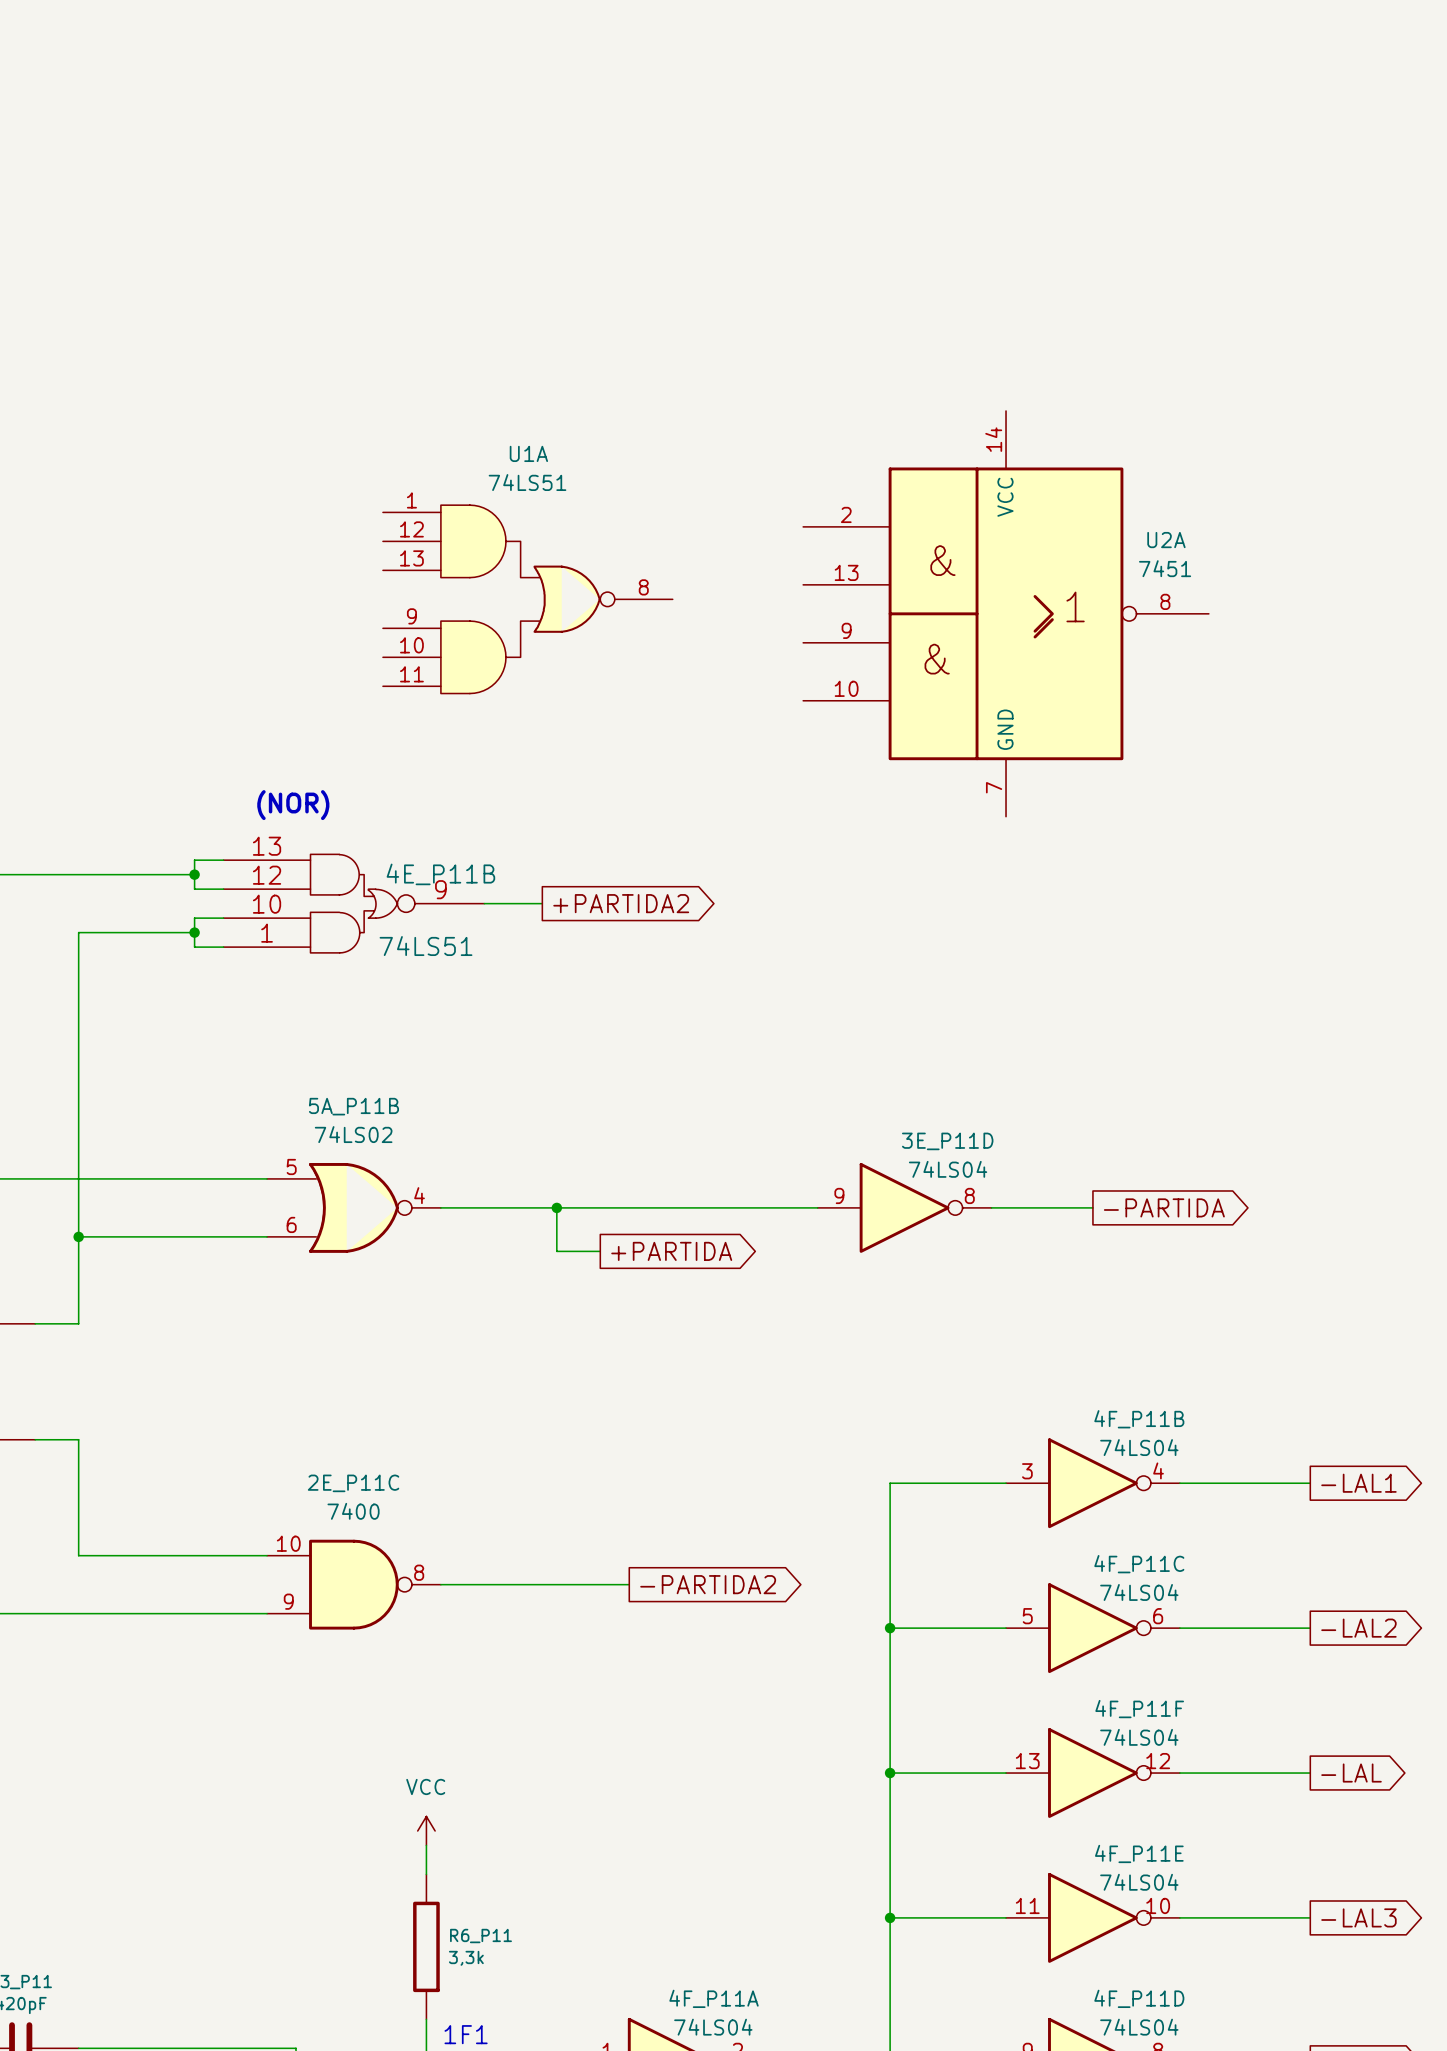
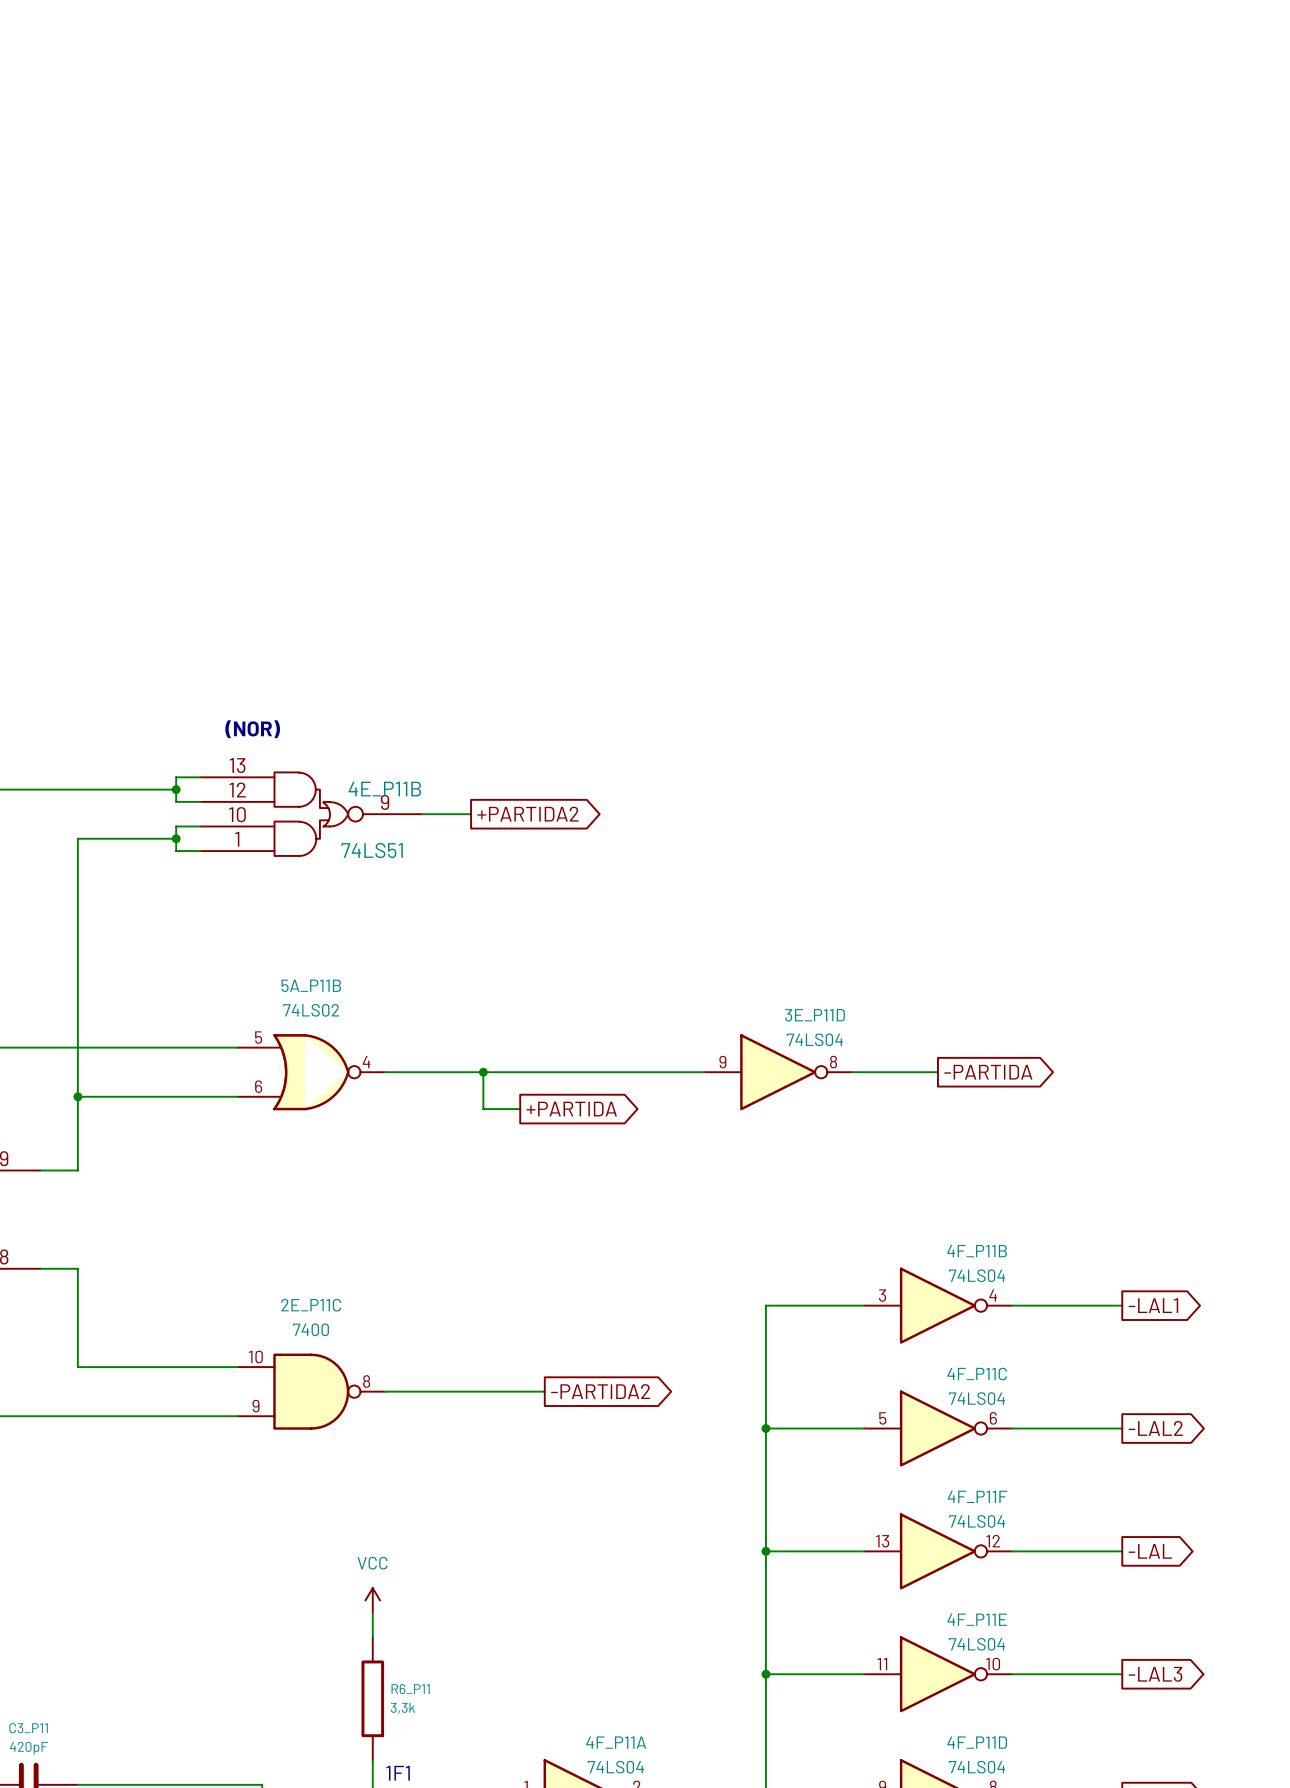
U1A: 74LS51 (527, 599) -> none
U2A: 7451 (1006, 613) -> none

